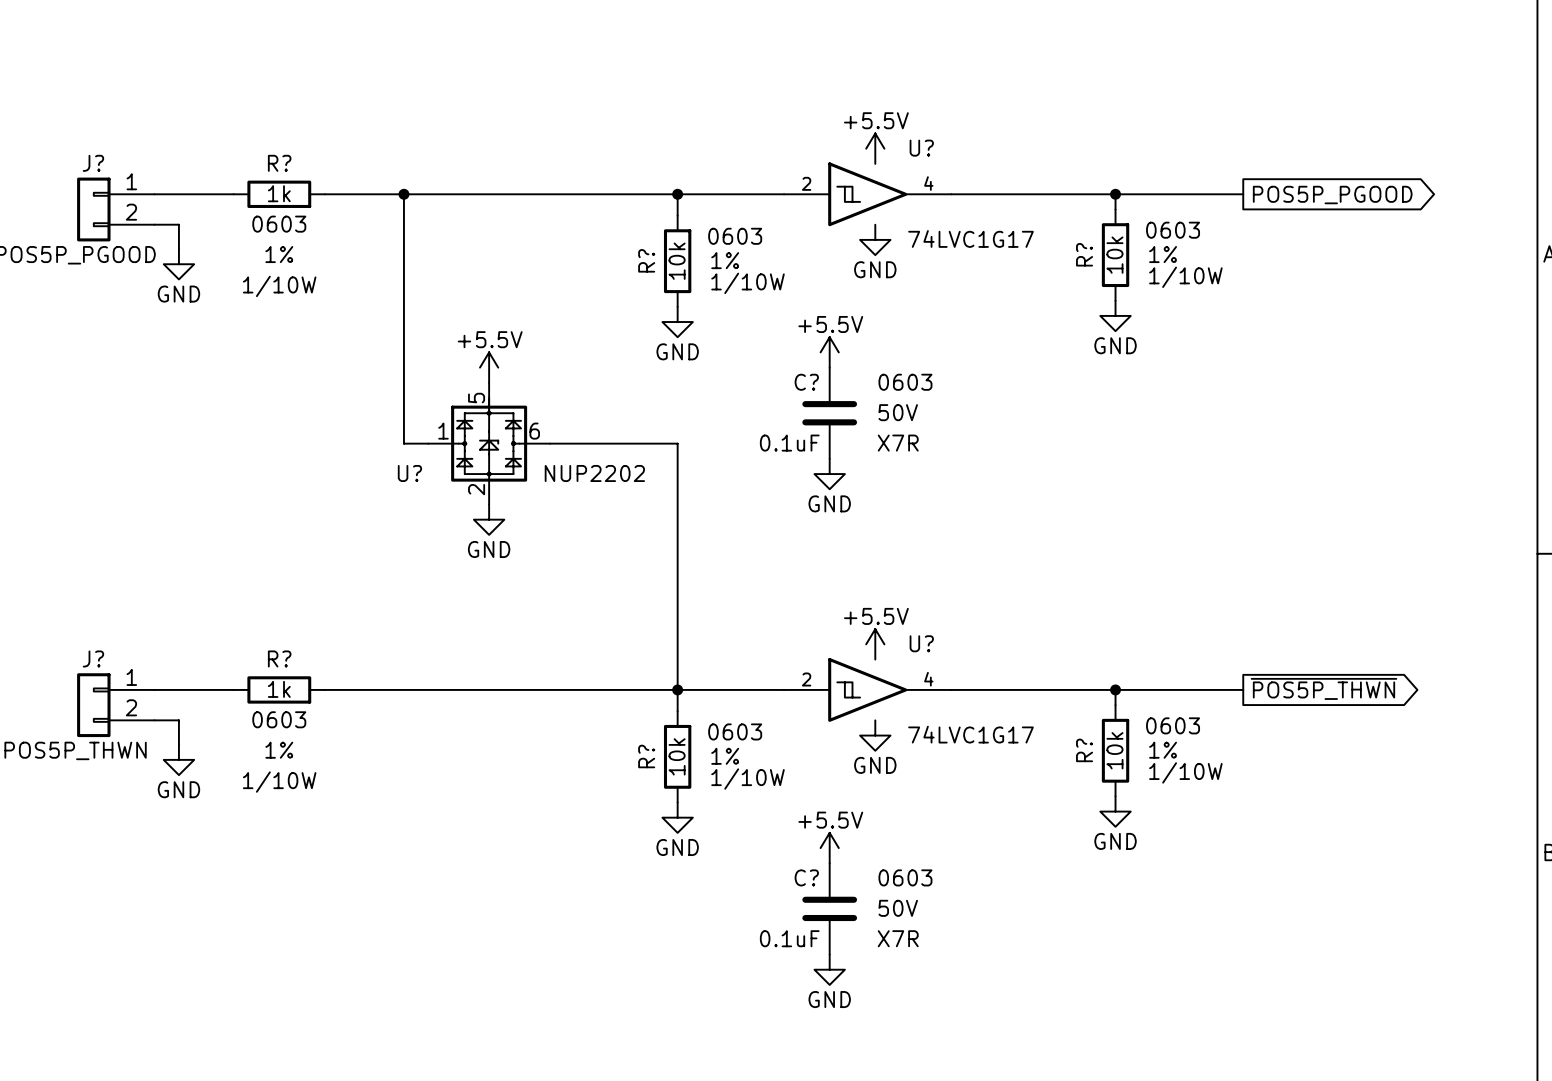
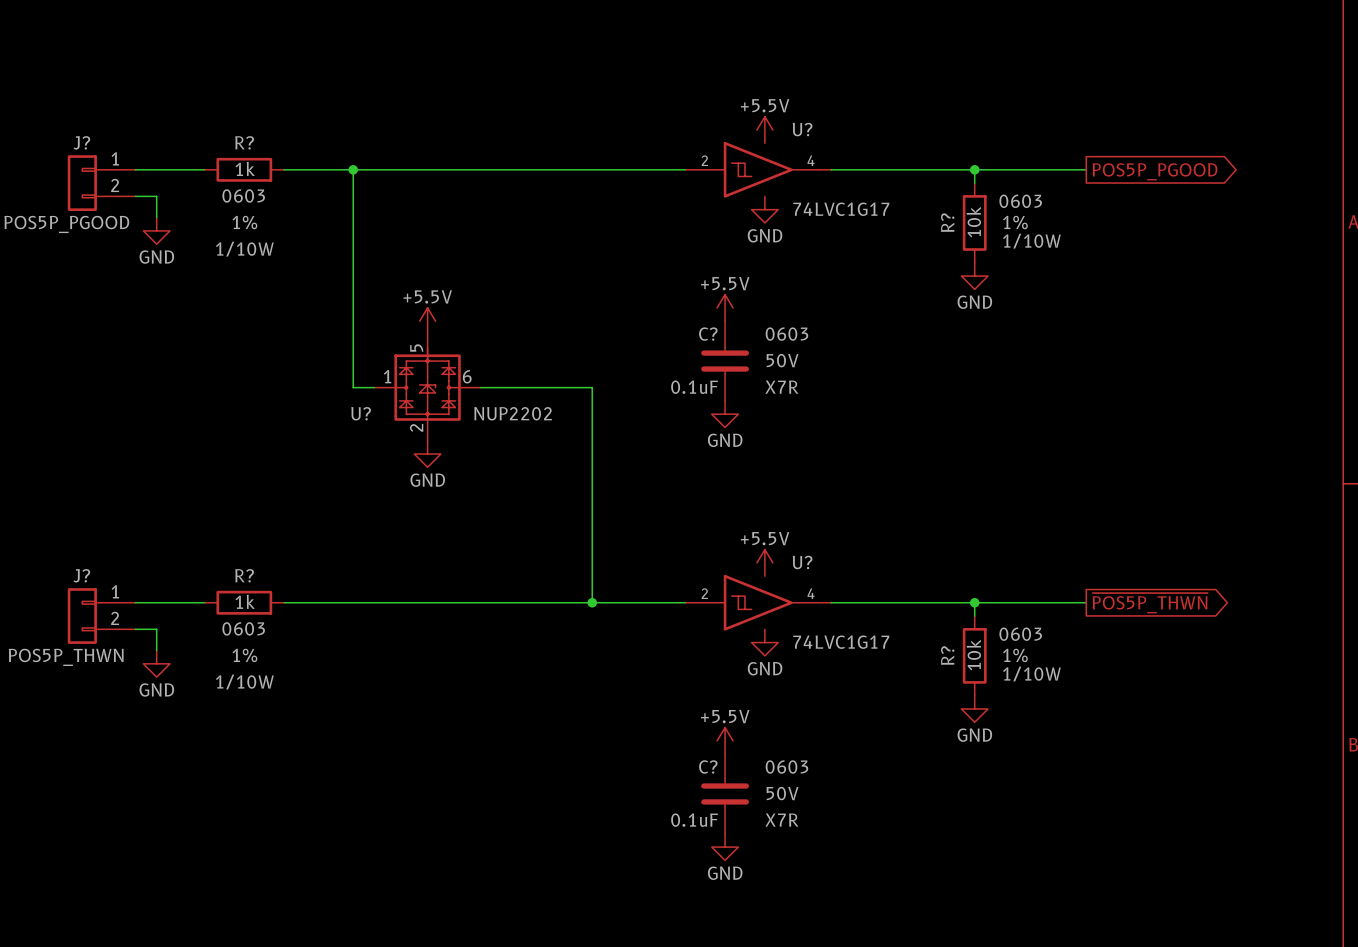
wire: (677, 194) (677, 215) -> none
junction: (677, 194) -> none
R?: 10k (677, 261) -> none
power symbol: GND (677, 322) -> none
wire: (677, 689) (677, 711) -> none
R?: 10k (677, 756) -> none
power symbol: GND (677, 817) -> none

